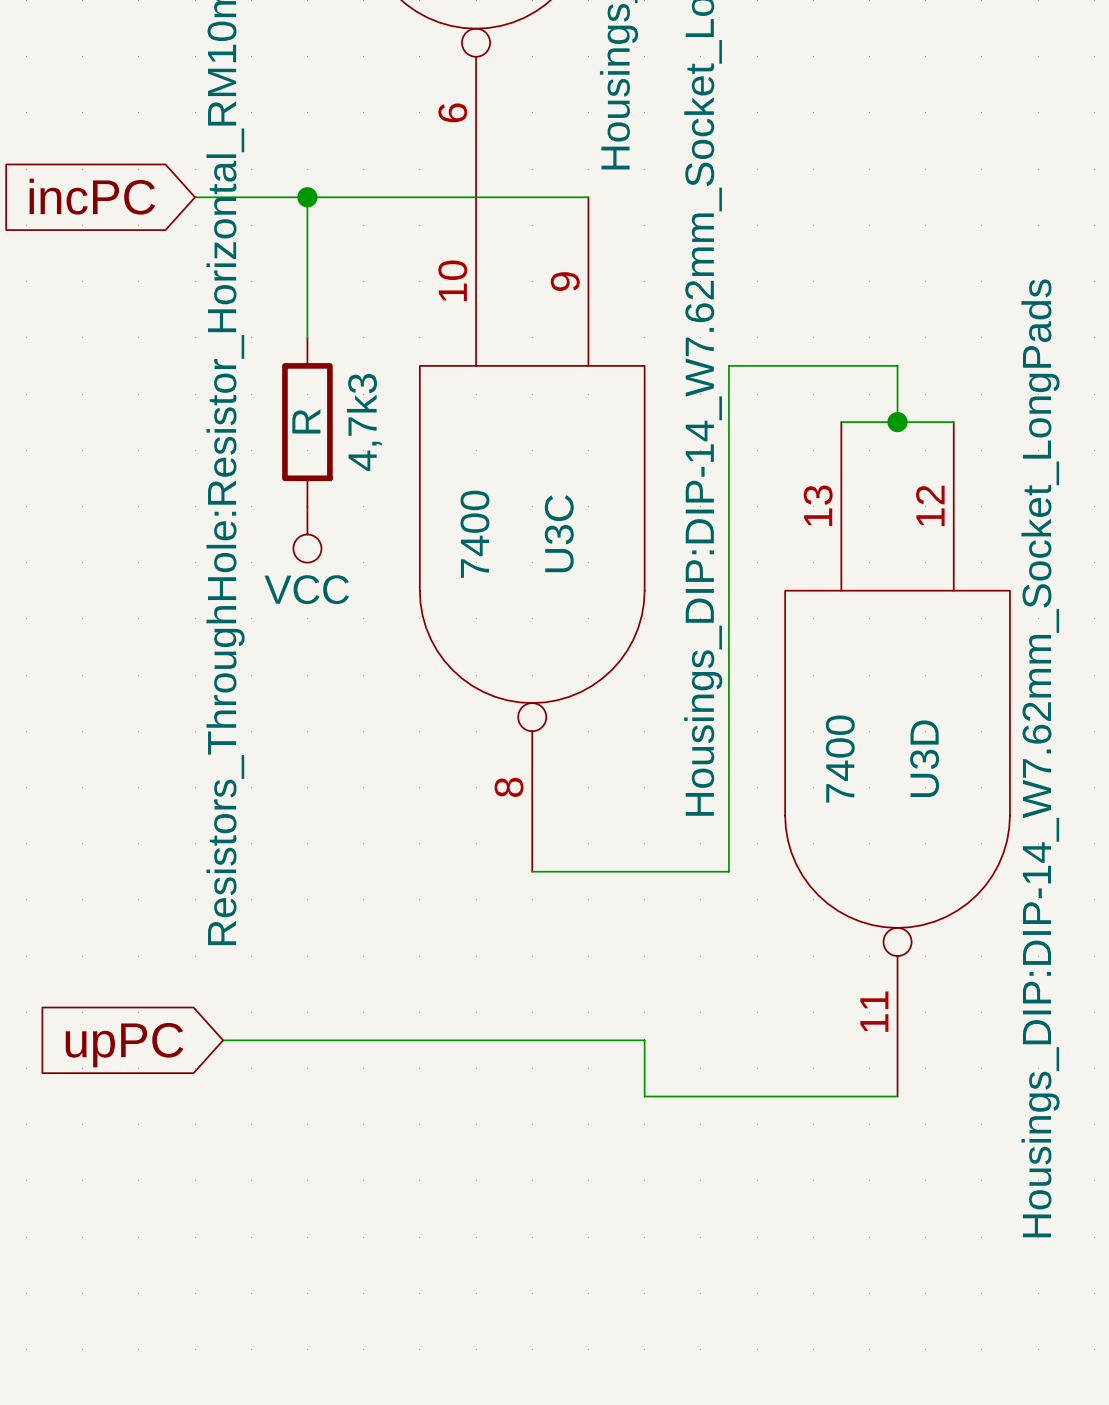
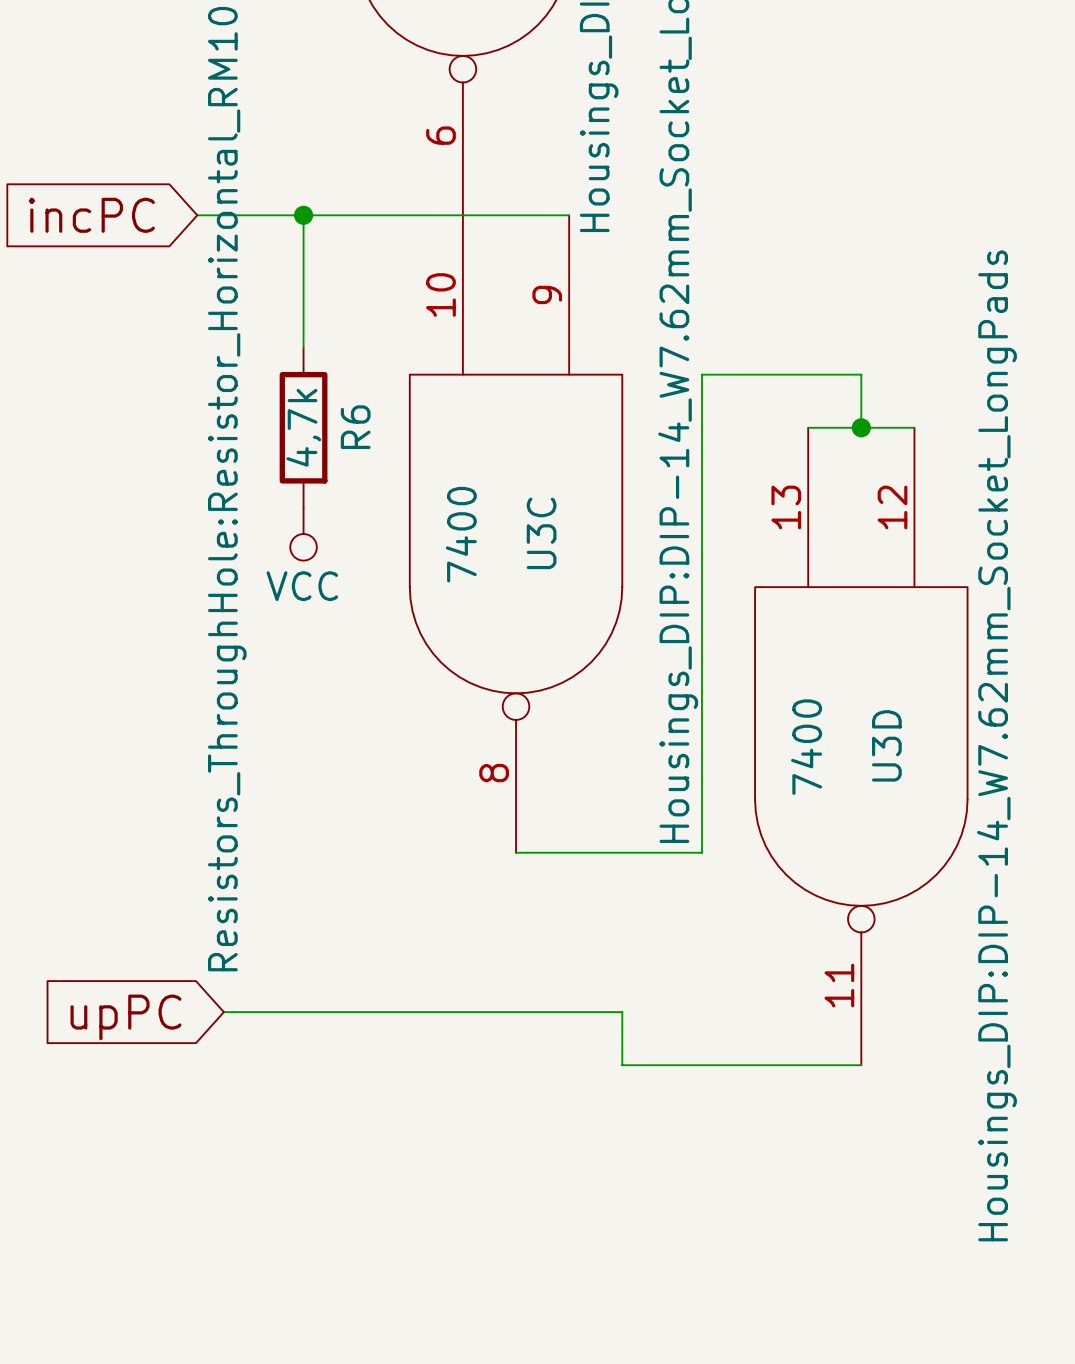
4,7k3 value: R (306, 421) -> 4,7k (303, 427)
4,7k3 name: 4,7k3 (364, 422) -> R6 (355, 427)

